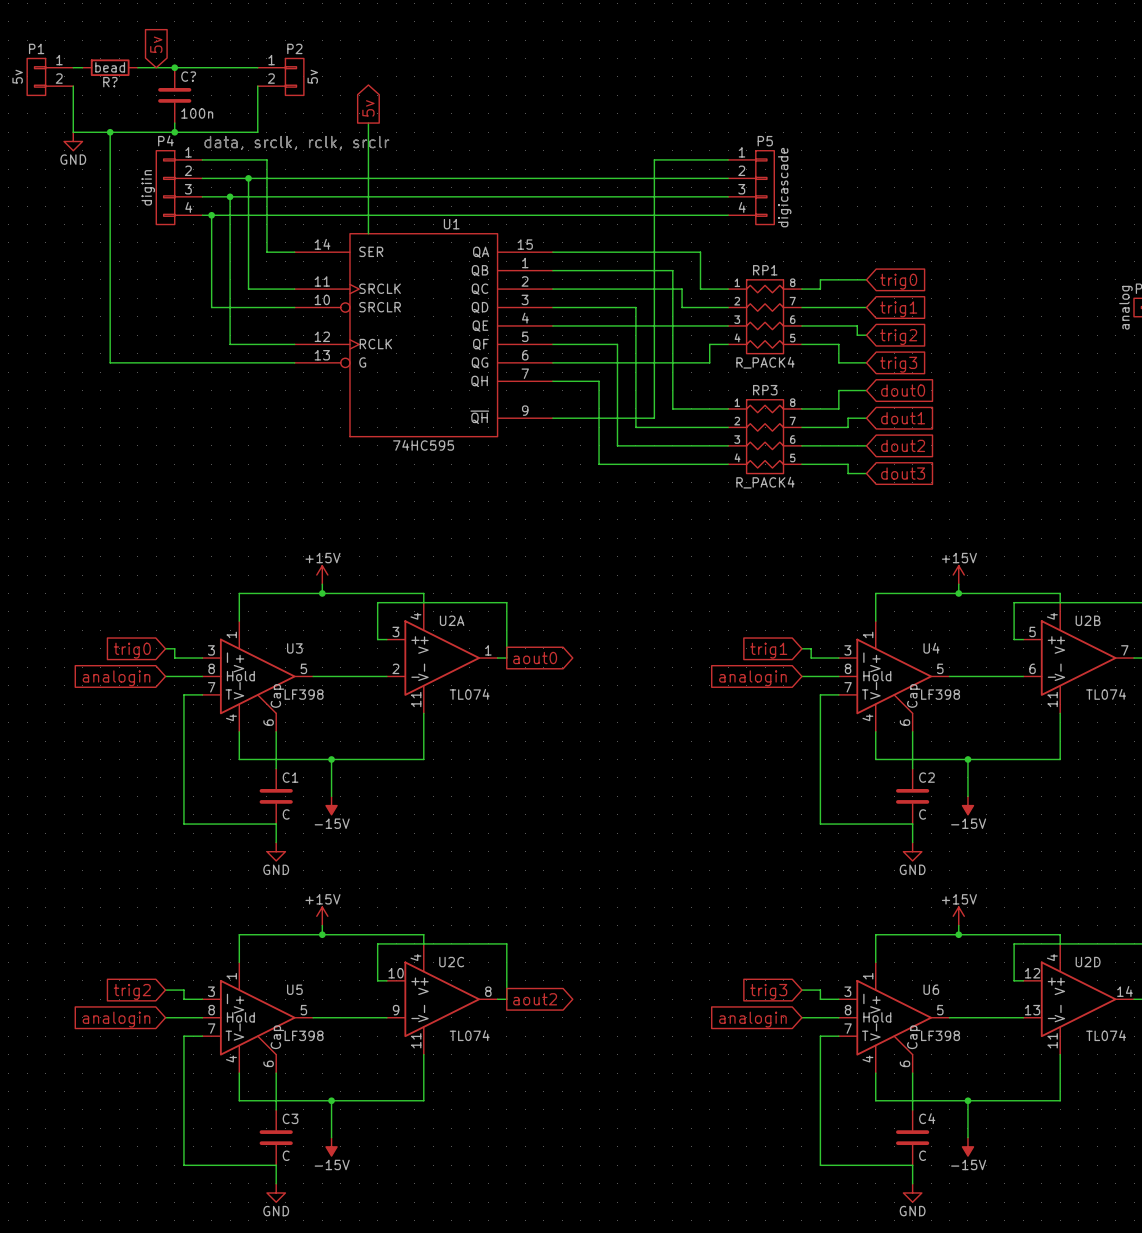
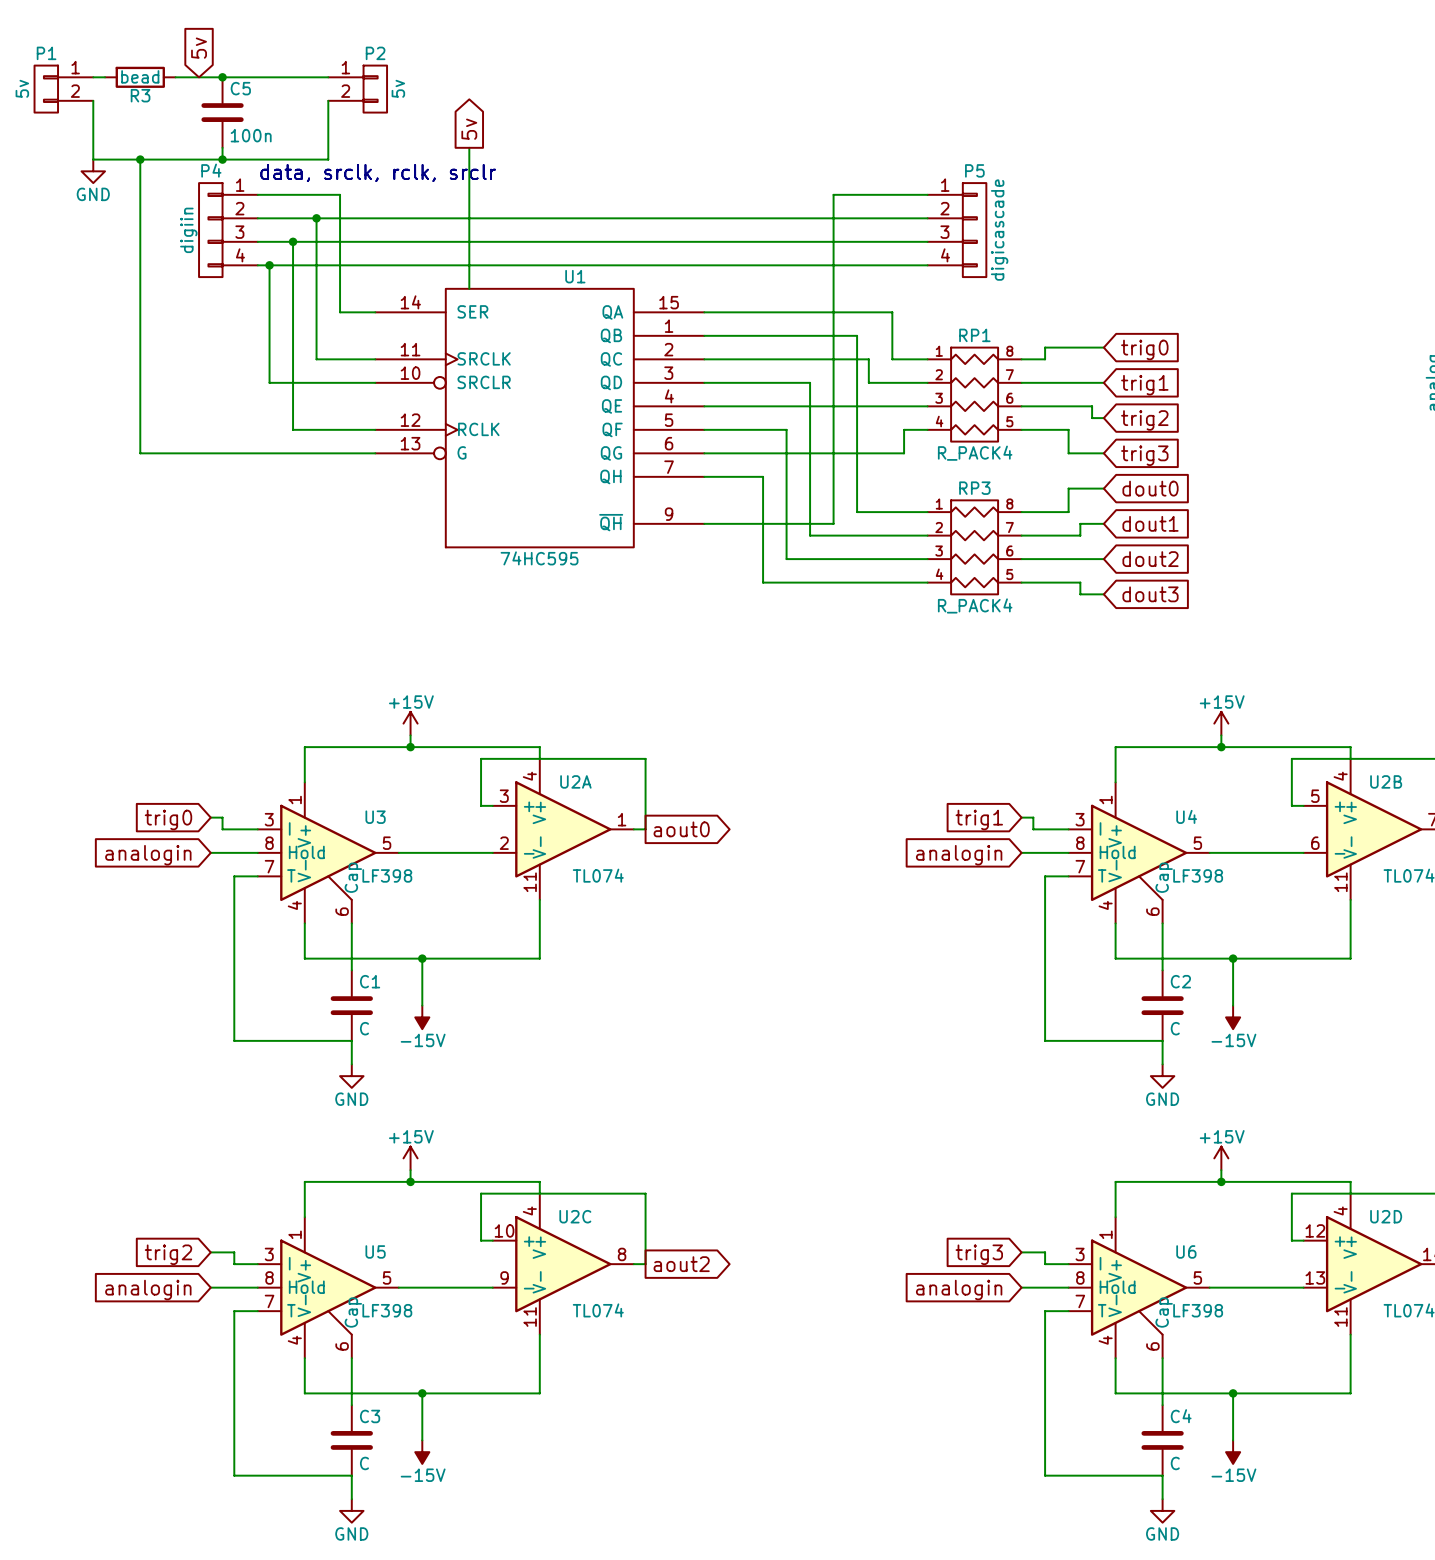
C? name: C? (188, 76) -> C5 (240, 88)
R? name: R? (110, 82) -> R3 (140, 95)

